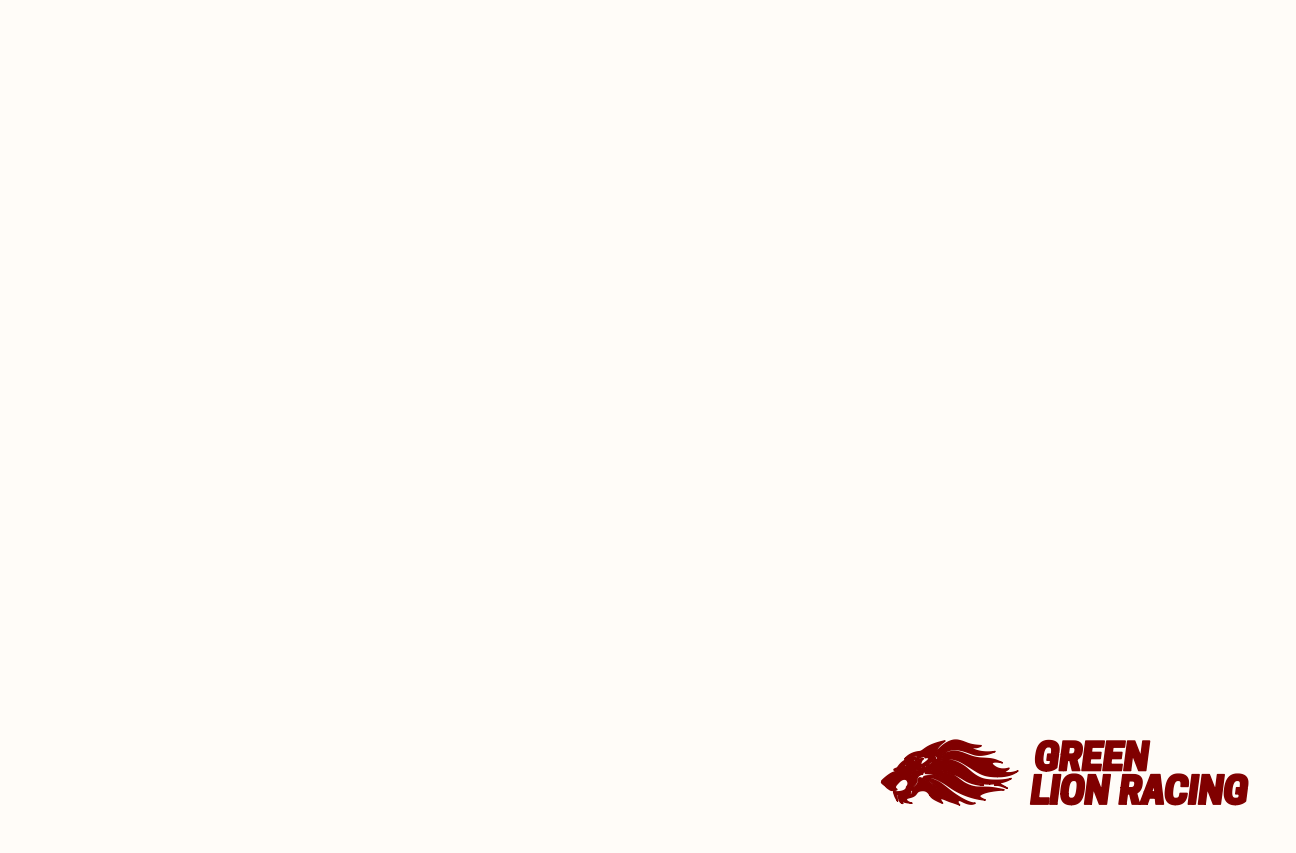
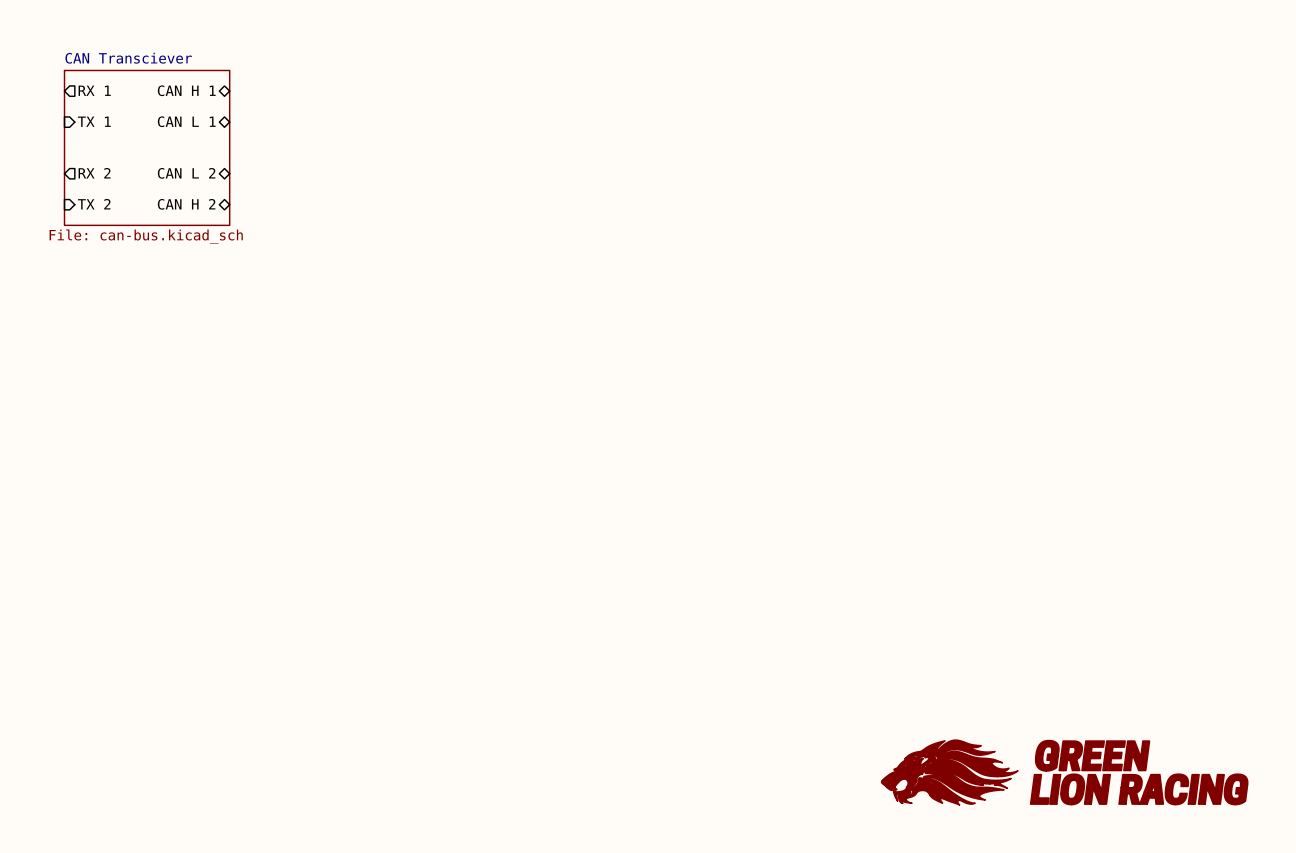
sheet pin: none -> RX 1 (94, 90)
sheet pin: none -> CAN H 1 (186, 90)
sheet pin: none -> TX 1 (94, 121)
sheet pin: none -> CAN L 1 (186, 121)
sheet CAN Transciever: none -> File: can-bus.kicad_sch (147, 147)
sheet pin: none -> RX 2 (94, 173)
sheet pin: none -> CAN L 2 (186, 173)
sheet pin: none -> TX 2 (94, 204)
sheet pin: none -> CAN H 2 (186, 204)

